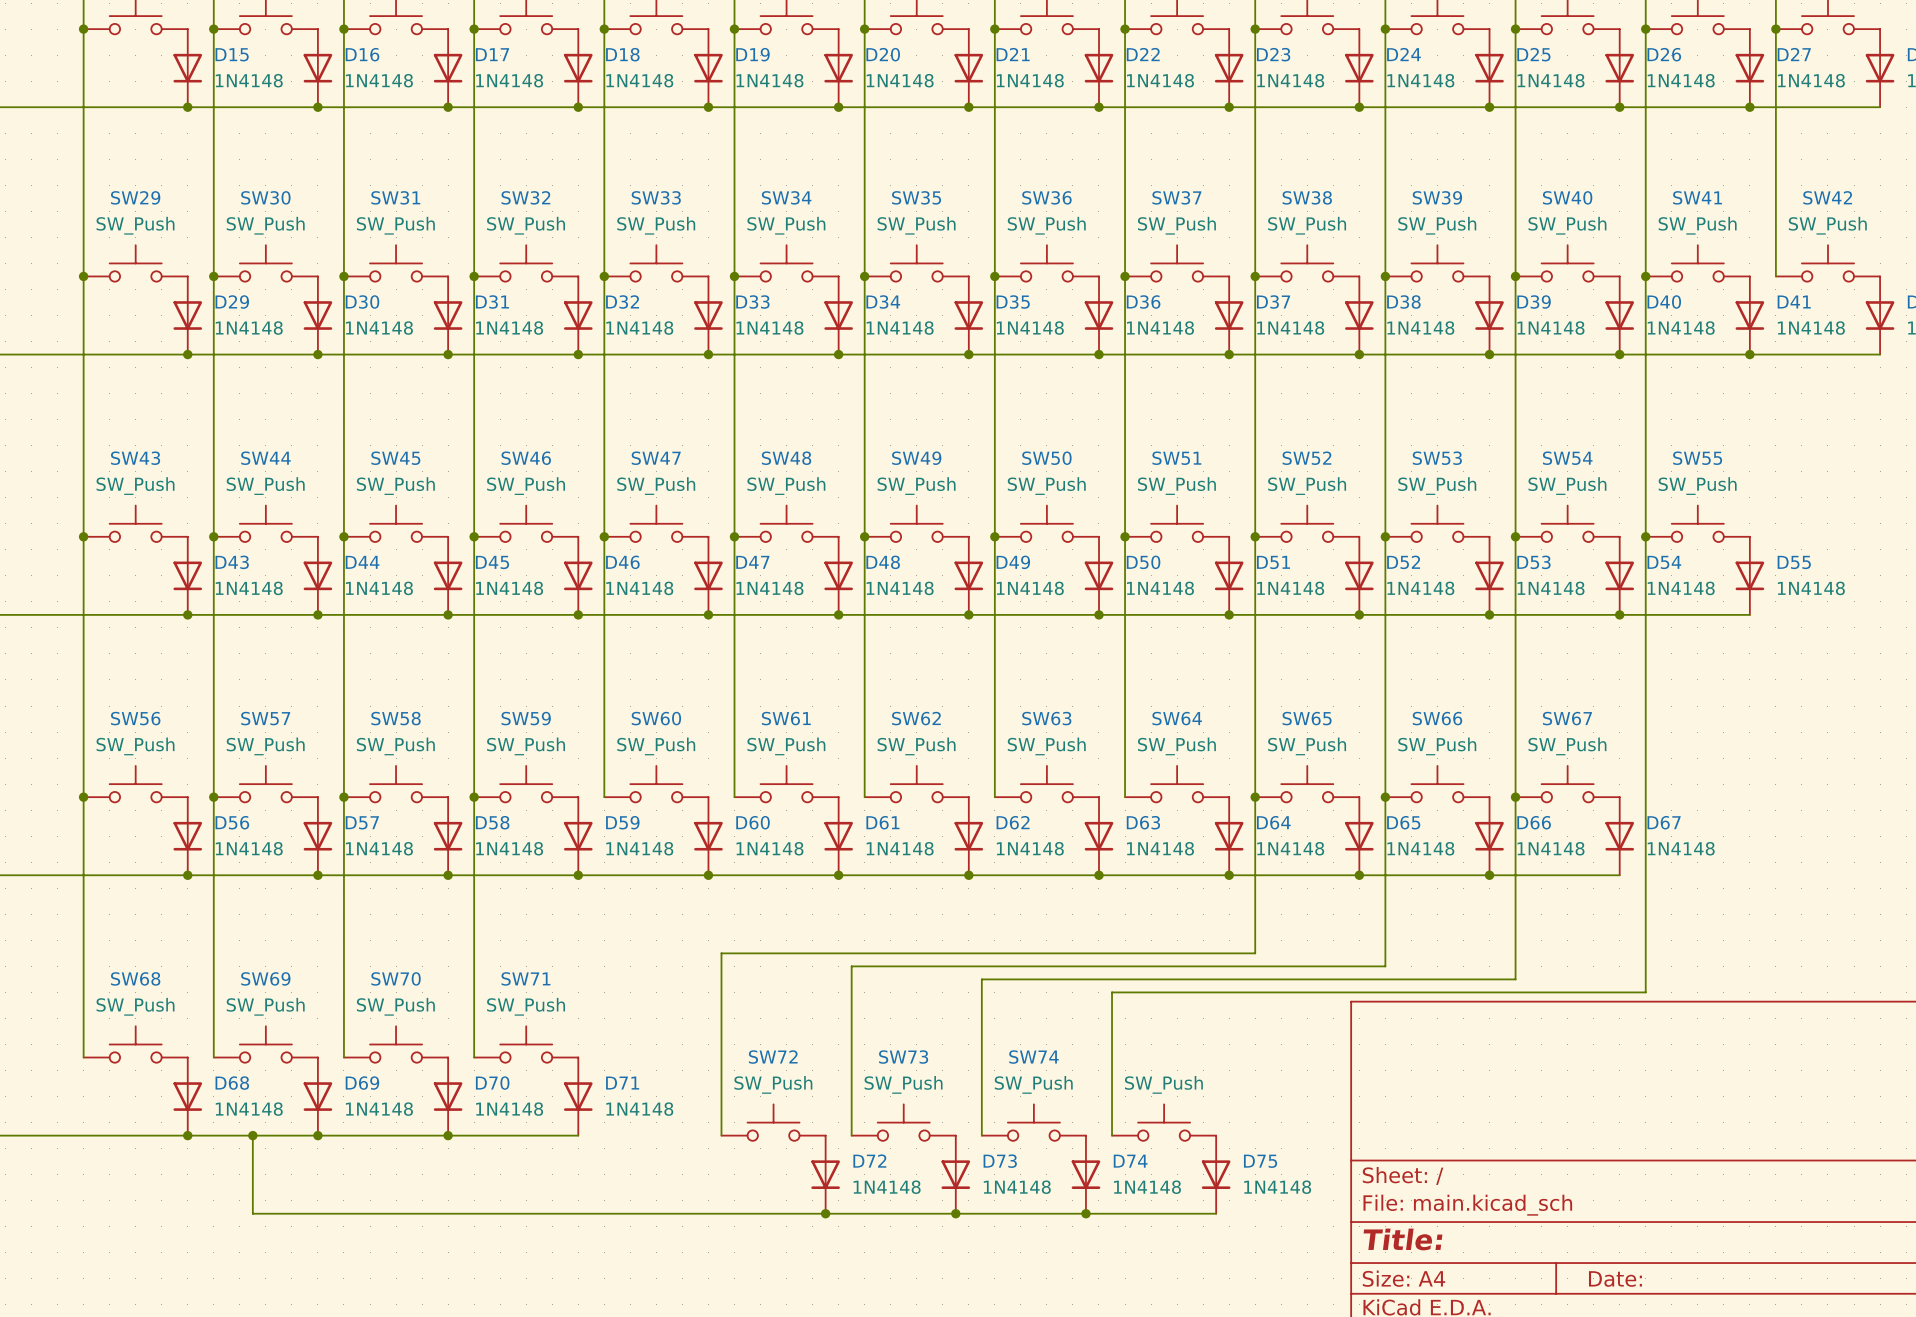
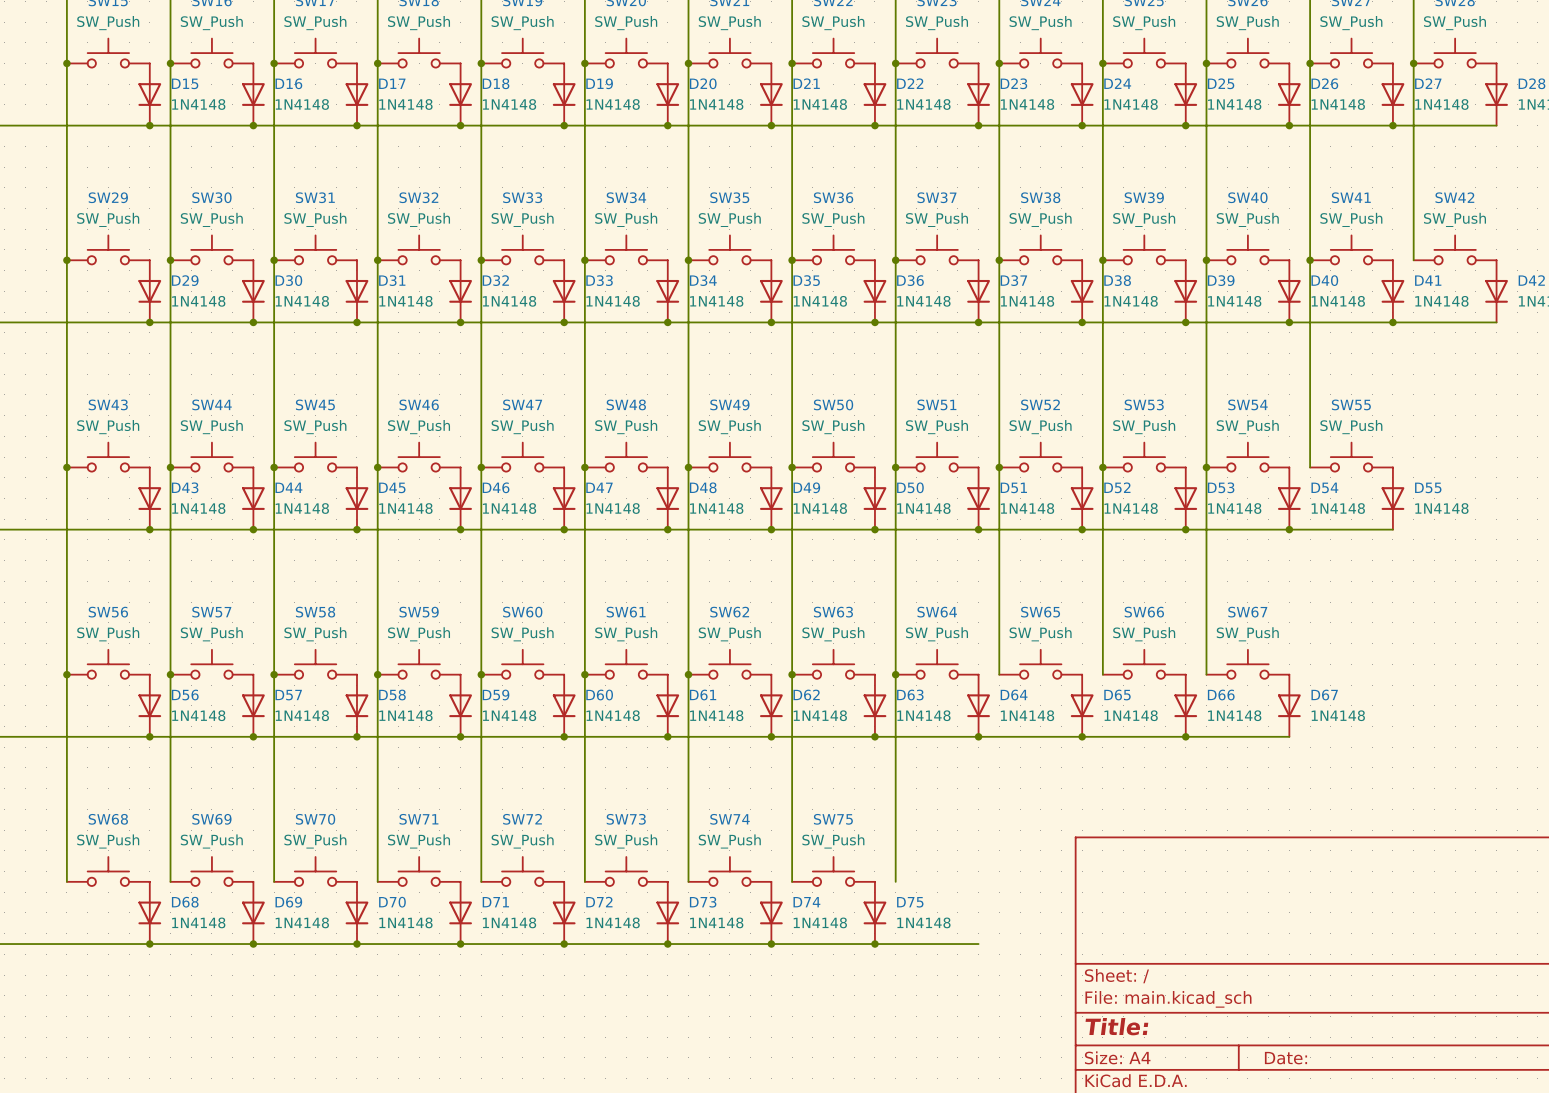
wire: (1645, 536) (1645, 992) (1112, 992) (1112, 1135) -> none
junction: (1645, 536) -> none
wire: none -> (481, 674) (481, 881)
junction: none -> (481, 674)
wire: none -> (584, 674) (584, 881)
junction: none -> (584, 674)
wire: none -> (688, 674) (688, 881)
junction: none -> (688, 674)
wire: none -> (792, 674) (792, 881)
junction: none -> (792, 674)
wire: none -> (895, 674) (895, 881)
junction: none -> (895, 674)
wire: (1255, 797) (1255, 953) (721, 953) (721, 1135) -> none
junction: (1255, 797) -> none
wire: (1385, 797) (1385, 966) (851, 966) (851, 1135) -> none
junction: (1385, 797) -> none
wire: (1515, 797) (1515, 979) (981, 979) (981, 1135) -> none
junction: (1515, 797) -> none
SW75: none -> SW_Push (833, 871)
SW72 position: (773, 1122) -> (522, 871)
SW73 position: (903, 1122) -> (626, 871)
SW74 position: (1033, 1122) -> (729, 871)
part: SW_Push (1164, 1122) -> none
wire: (252, 1135) (252, 1213) (1216, 1213) -> none
junction: (252, 1135) -> none
wire: none -> (460, 944) (978, 944)
junction: none -> (460, 944)
junction: none -> (564, 944)
junction: none -> (667, 944)
junction: none -> (771, 944)
junction: none -> (874, 944)
D72 position: (825, 1174) -> (564, 912)
D73 position: (955, 1174) -> (667, 912)
D74 position: (1085, 1174) -> (771, 912)
D75 position: (1216, 1174) -> (874, 912)
junction: (825, 1213) -> none
junction: (955, 1213) -> none
junction: (1085, 1213) -> none

